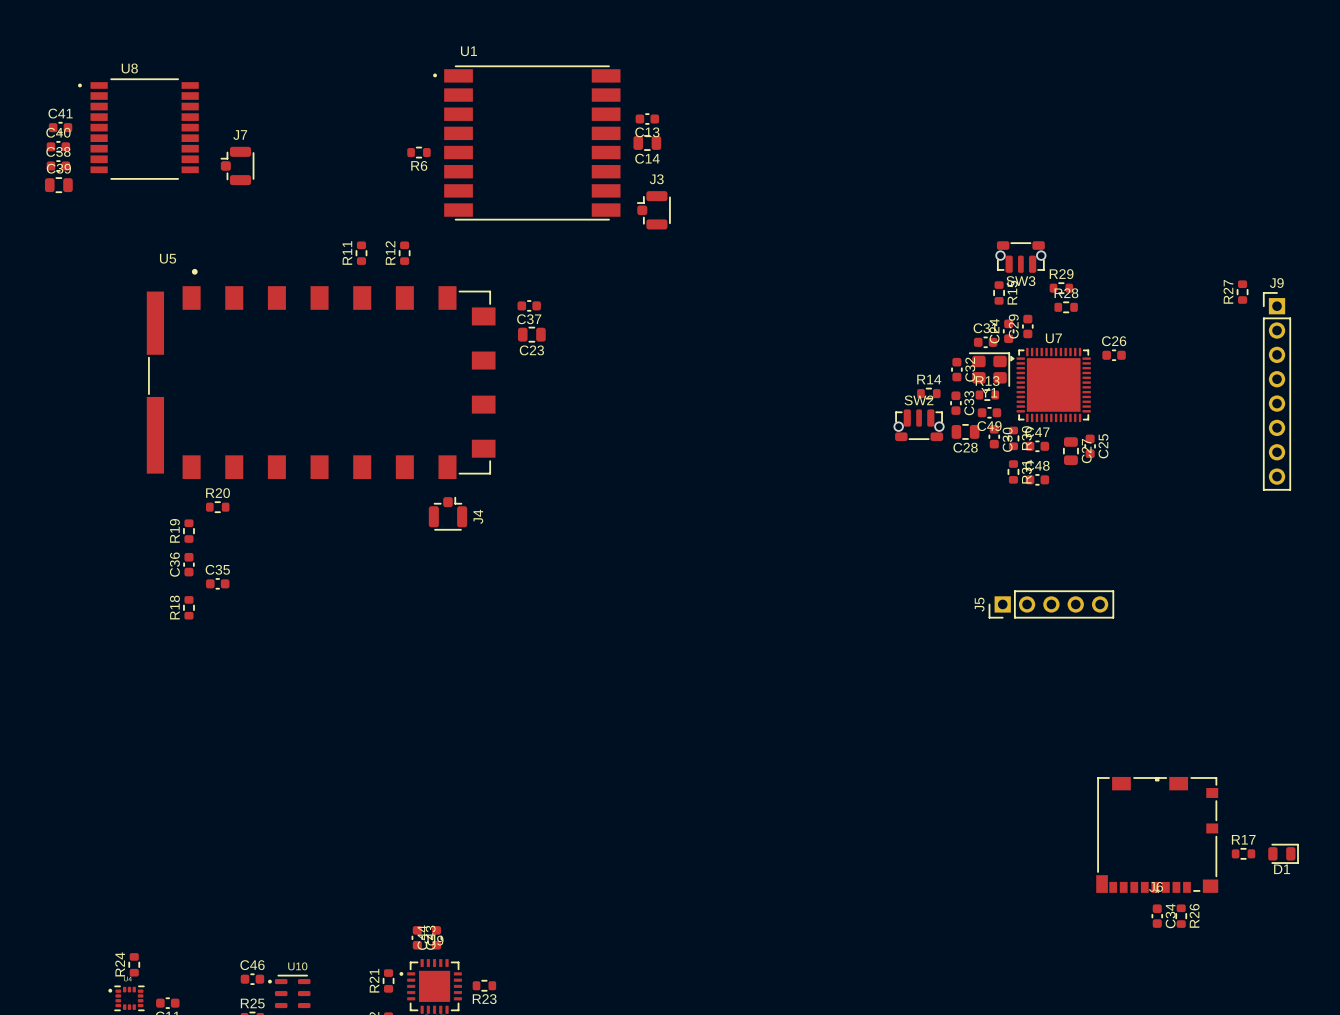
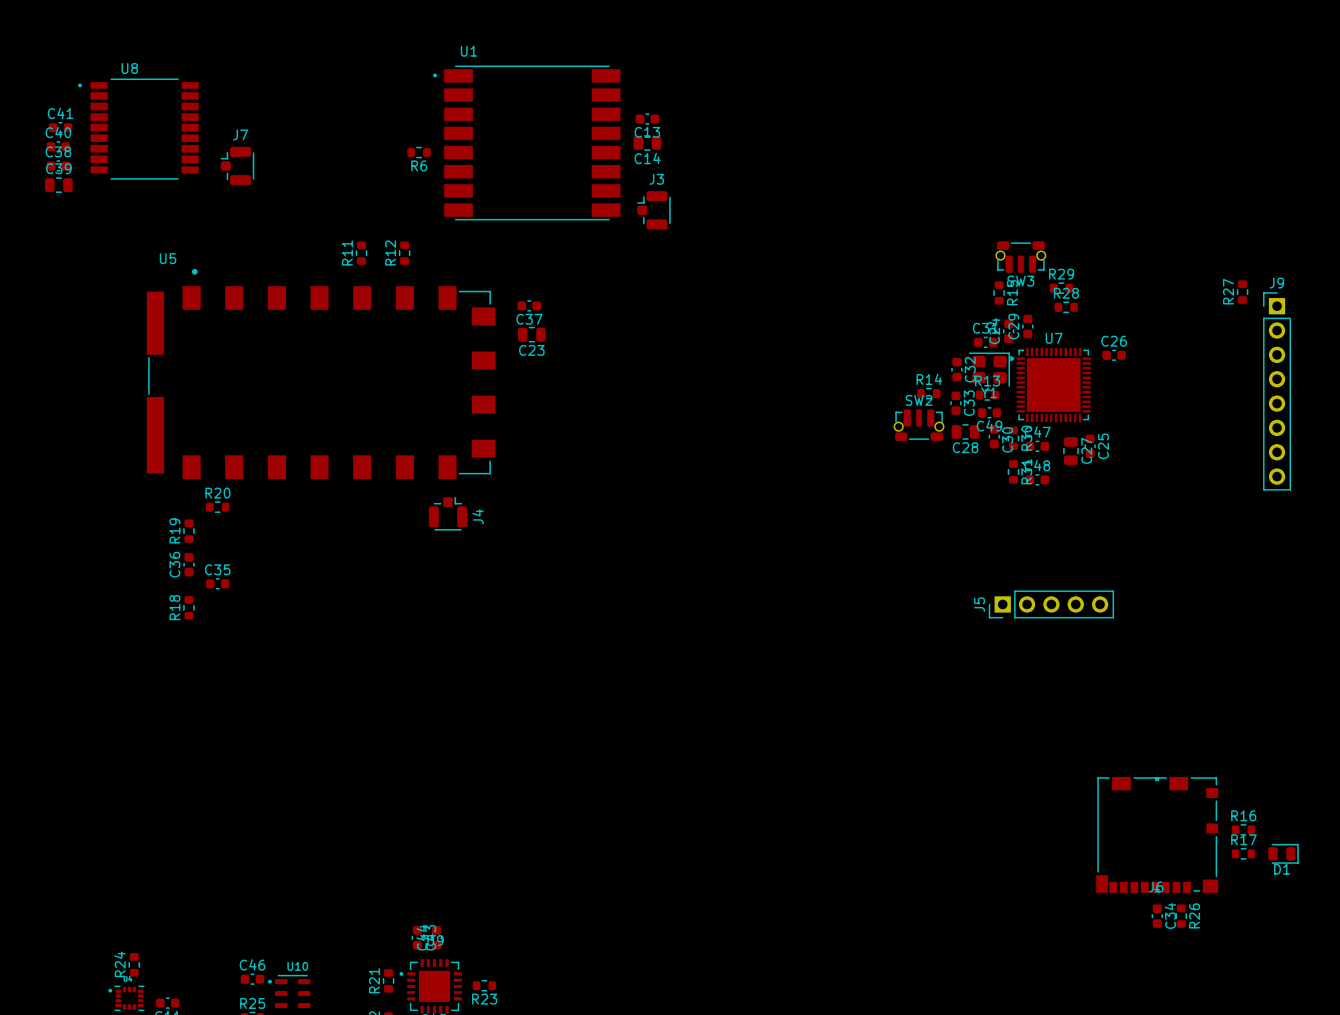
R16: none -> (1243, 829)

